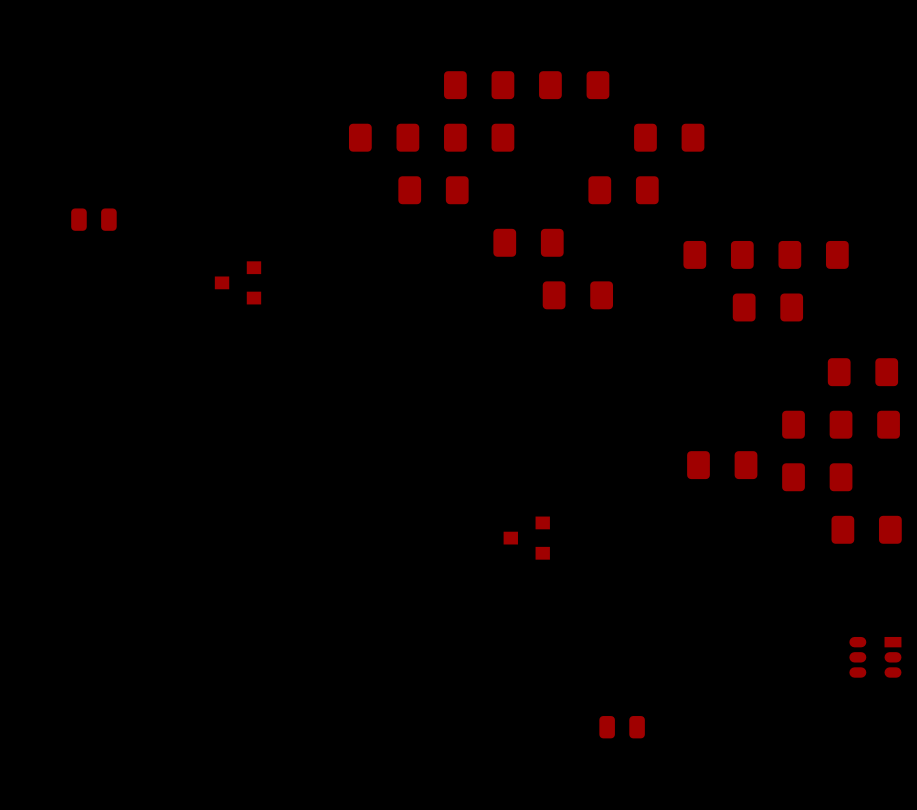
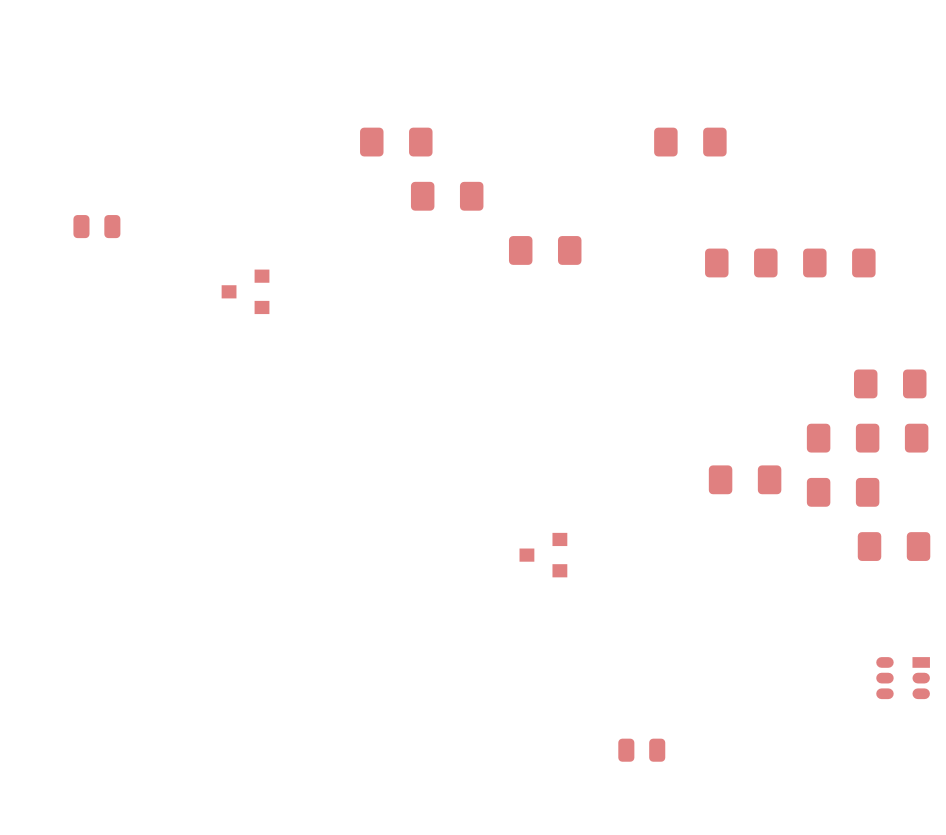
part: (479, 85) -> none
part: (574, 85) -> none
part: (479, 137) -> none
part: (623, 190) -> none
part: (577, 295) -> none
part: (767, 307) -> none

